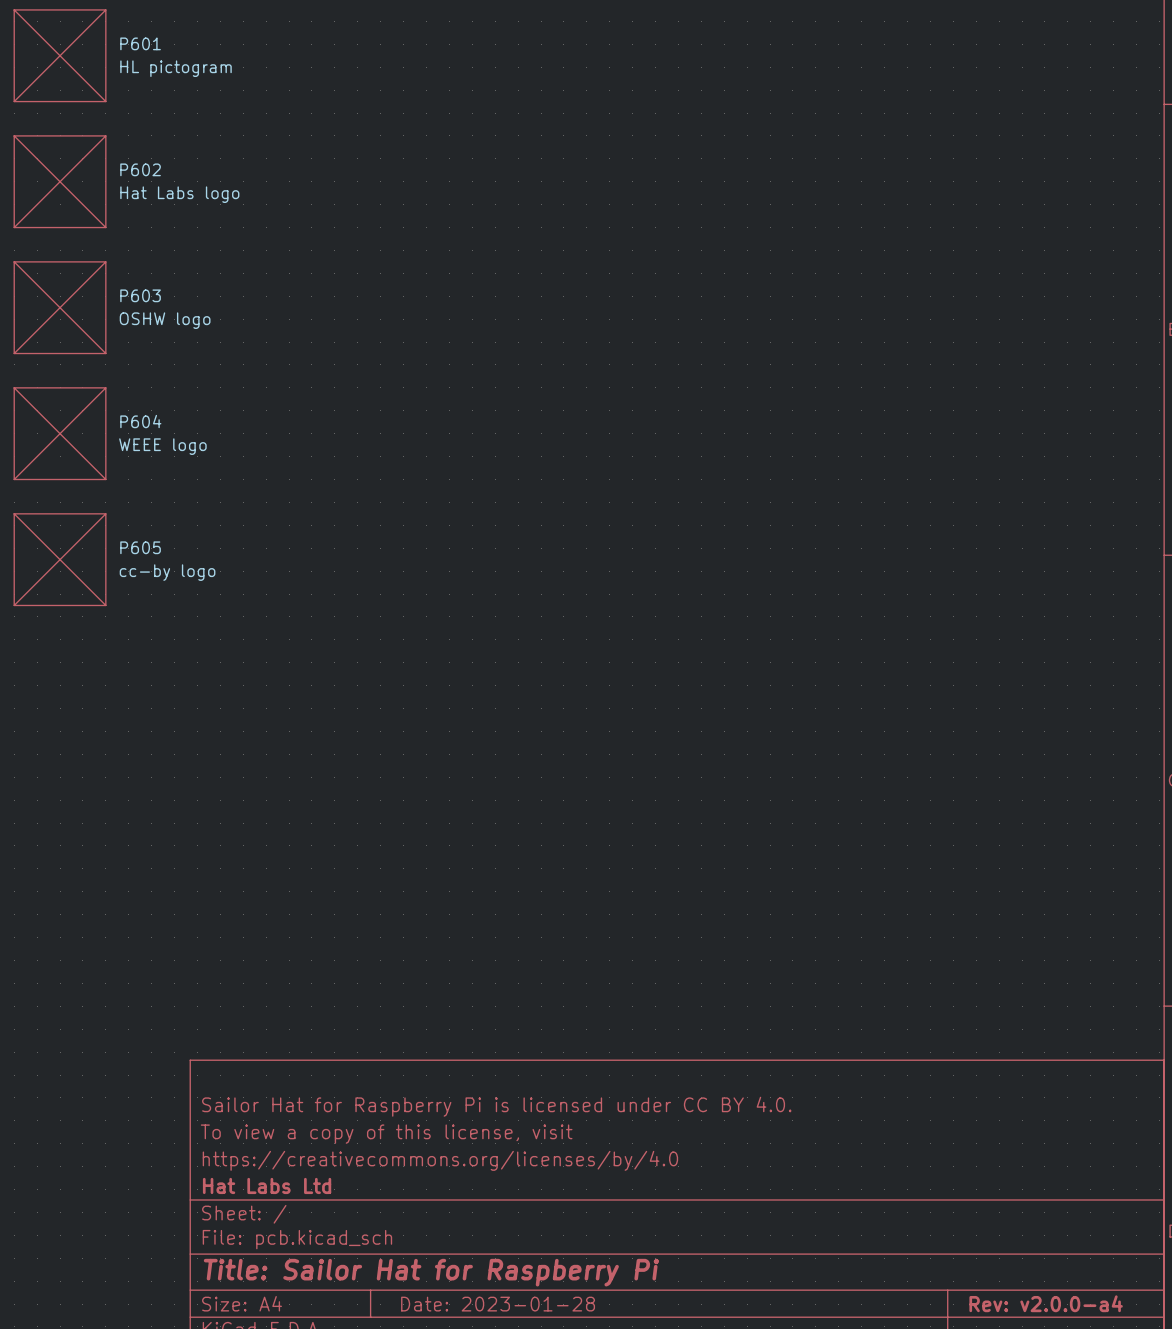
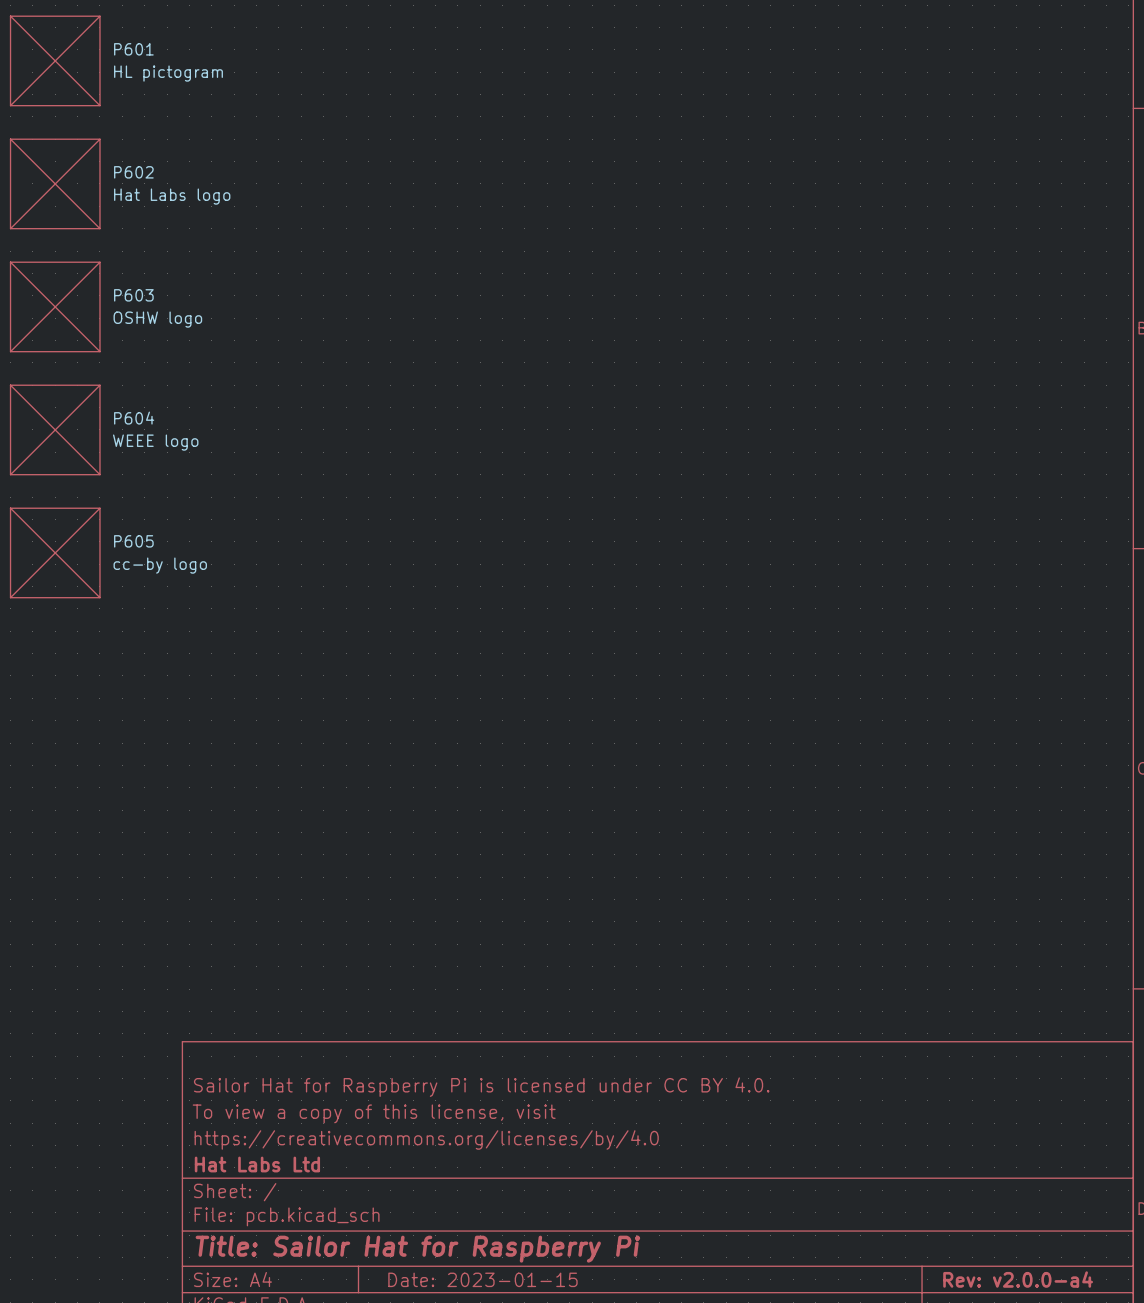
title block: Date: 2023-01-28 (498, 1304) -> Date: 2023-01-15 (482, 1279)

